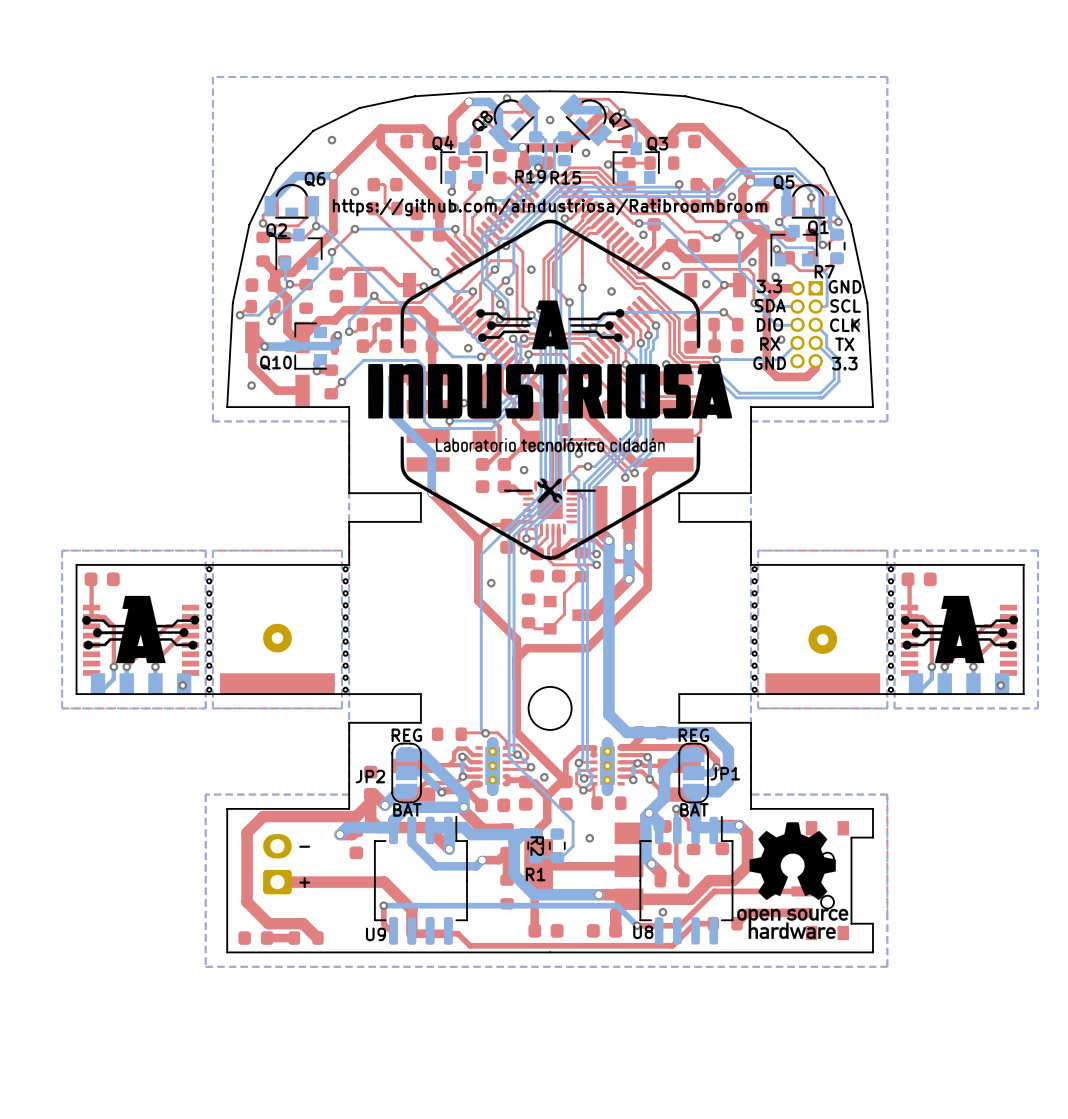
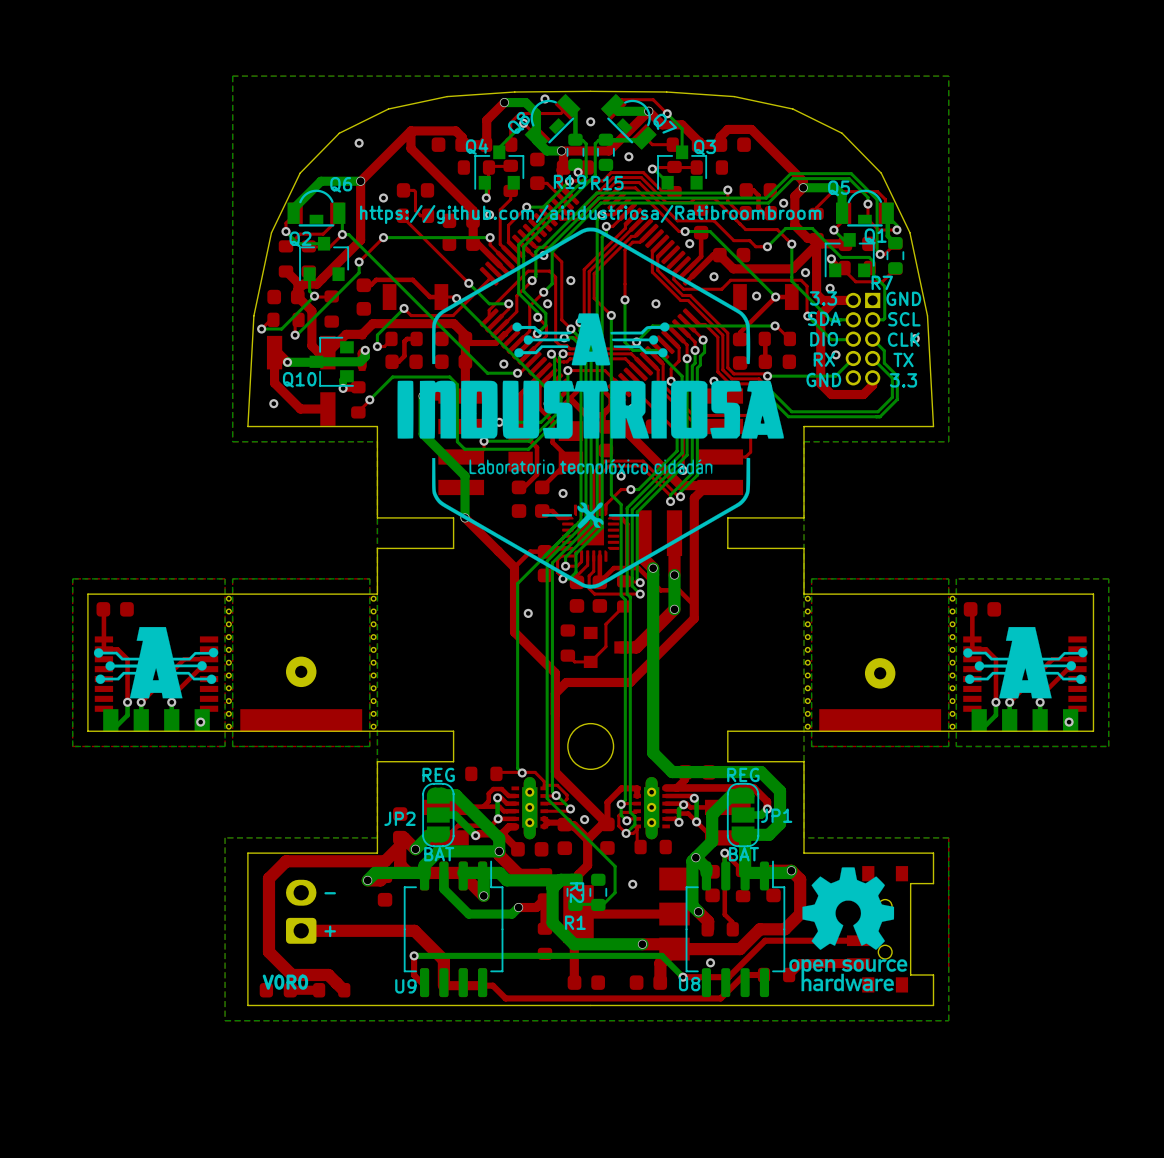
text: none -> V0R0 (285, 982)

